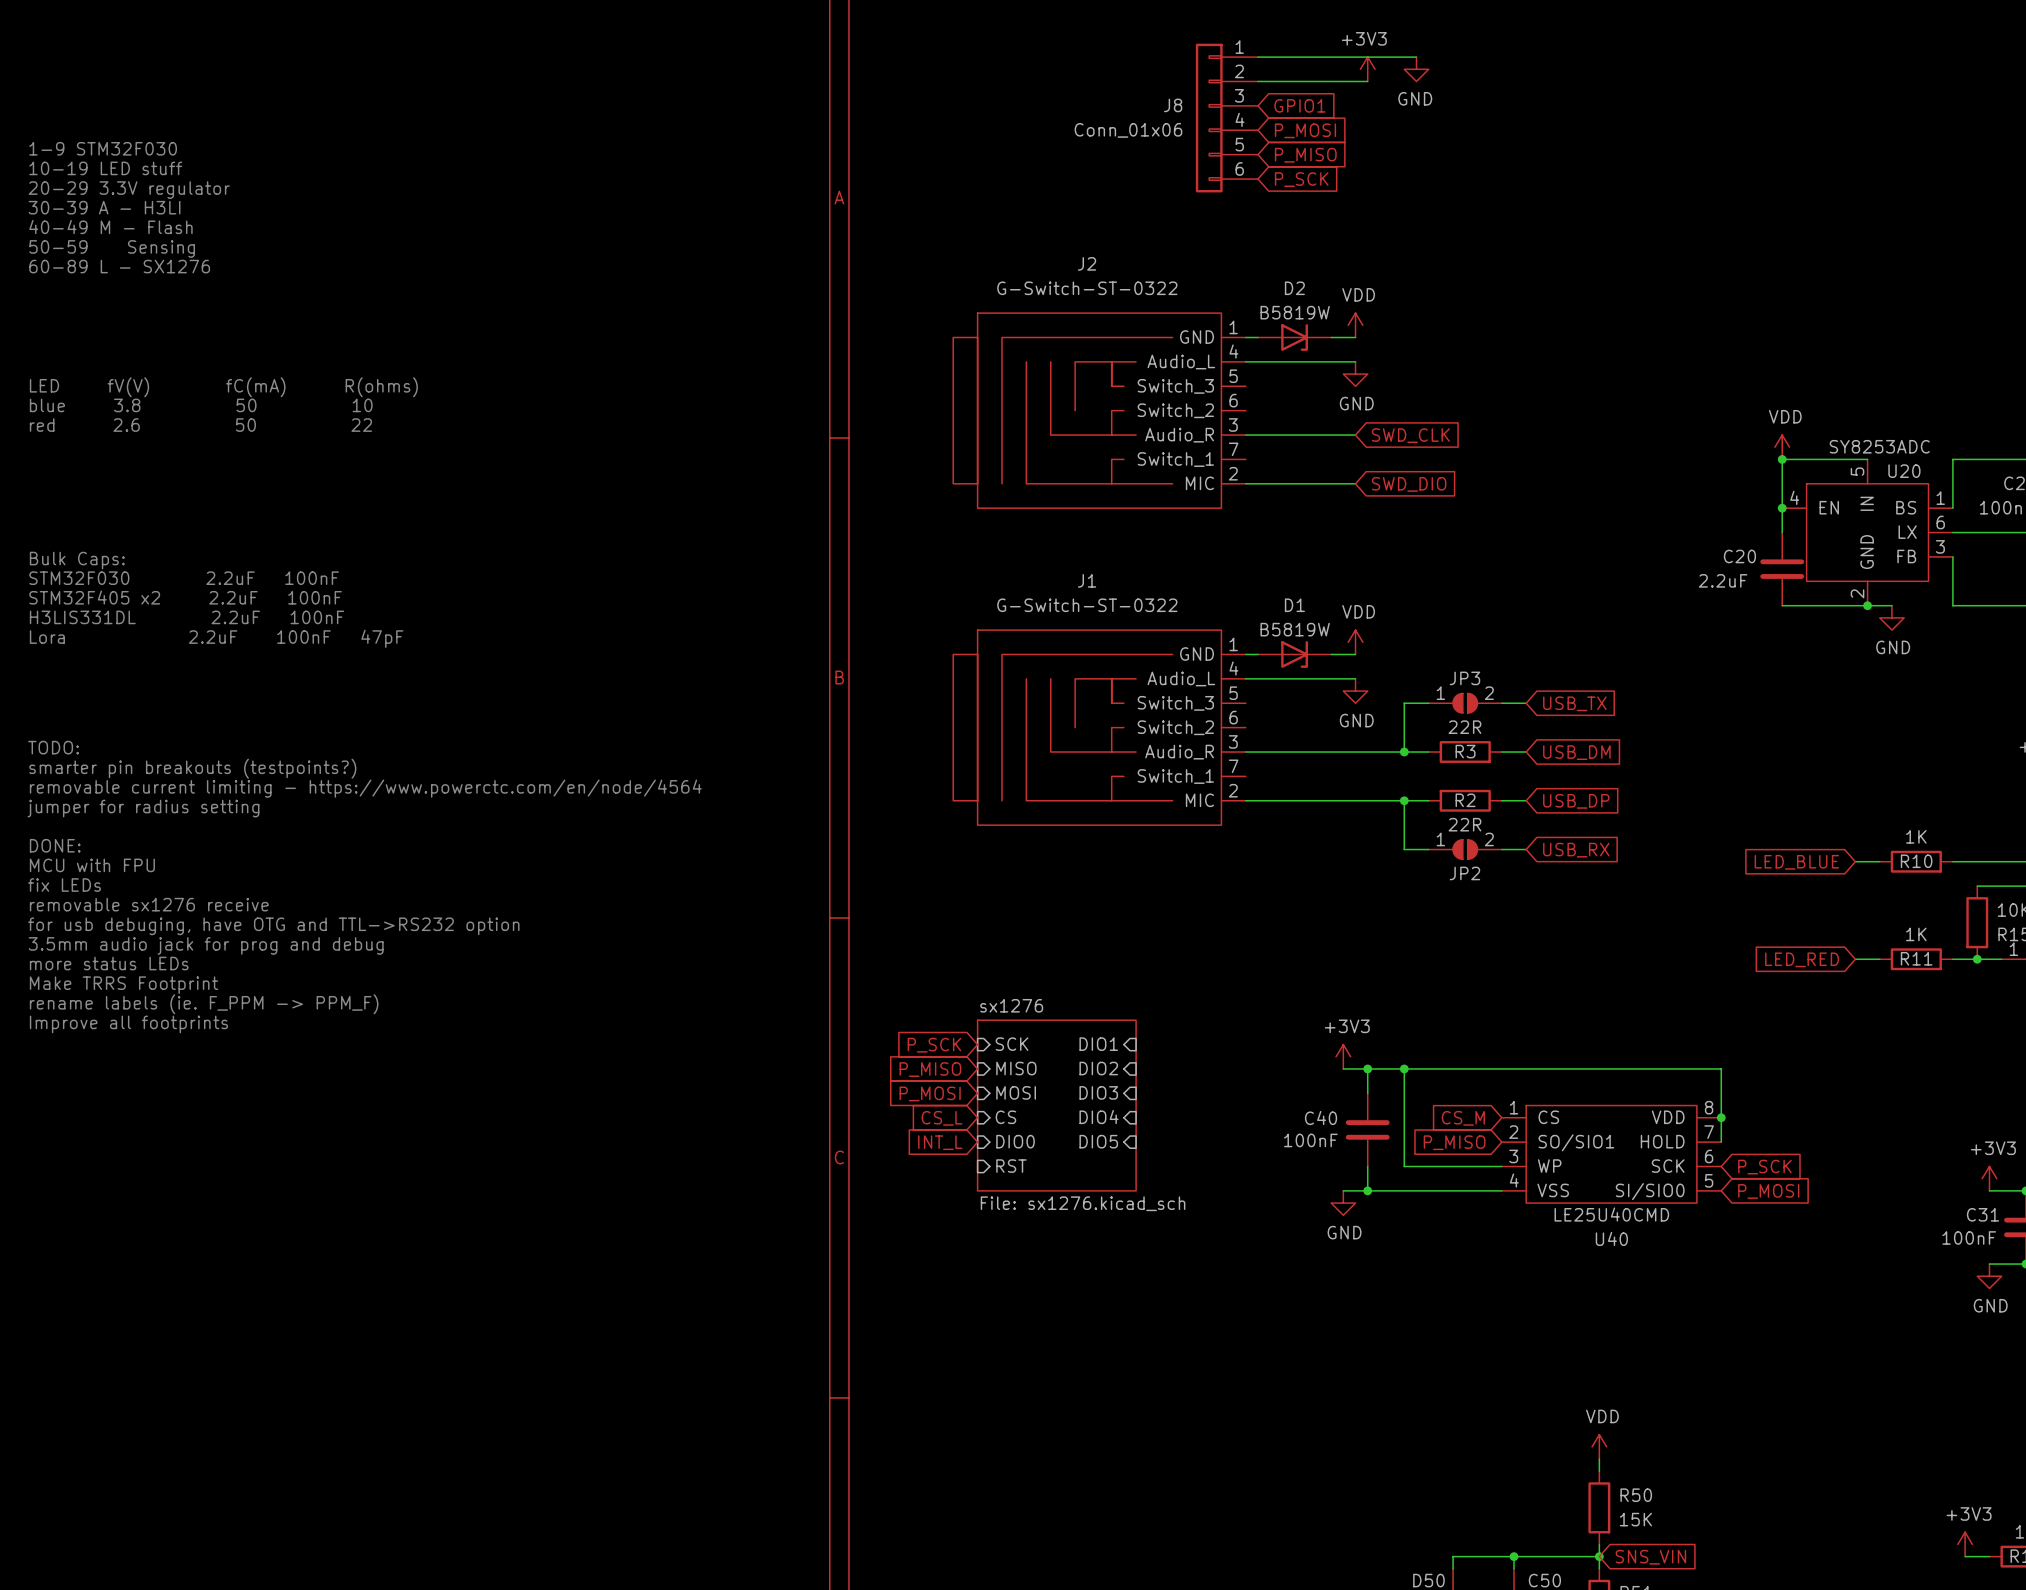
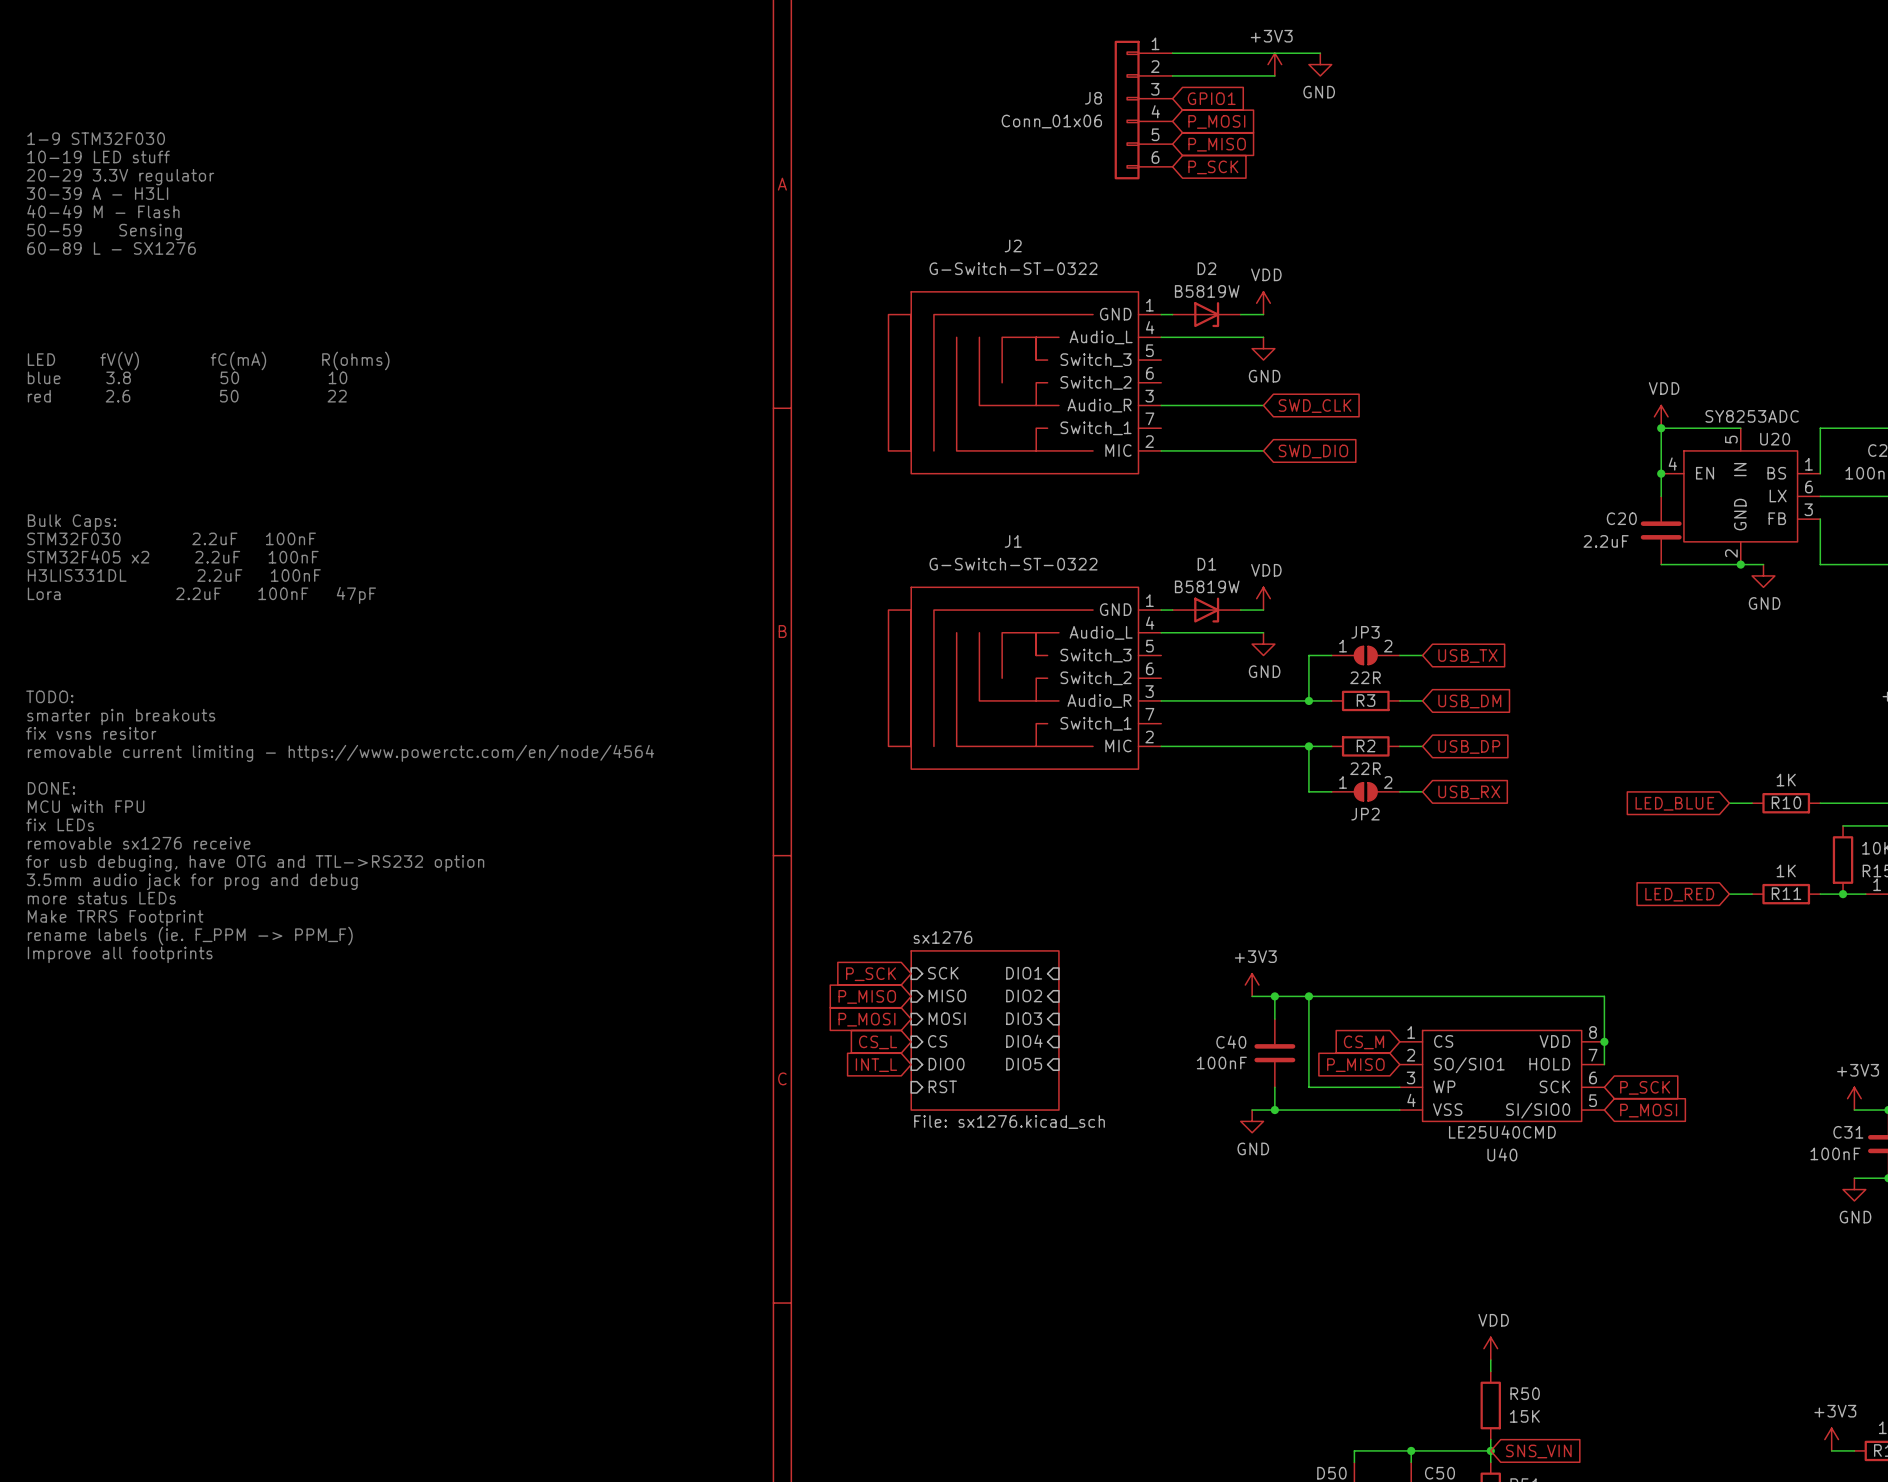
text: smarter pin breakouts (testpoints?) (192, 768) -> smarter pin breakouts (121, 717)
text: removable current limiting - https://www.powerctc.com/en/node/4564 (365, 788) -> fix vsns resitor (91, 733)
text: jumper for radius setting (143, 808) -> removable current limiting - https://www.powerctc.com/en/node/4564 (340, 753)

